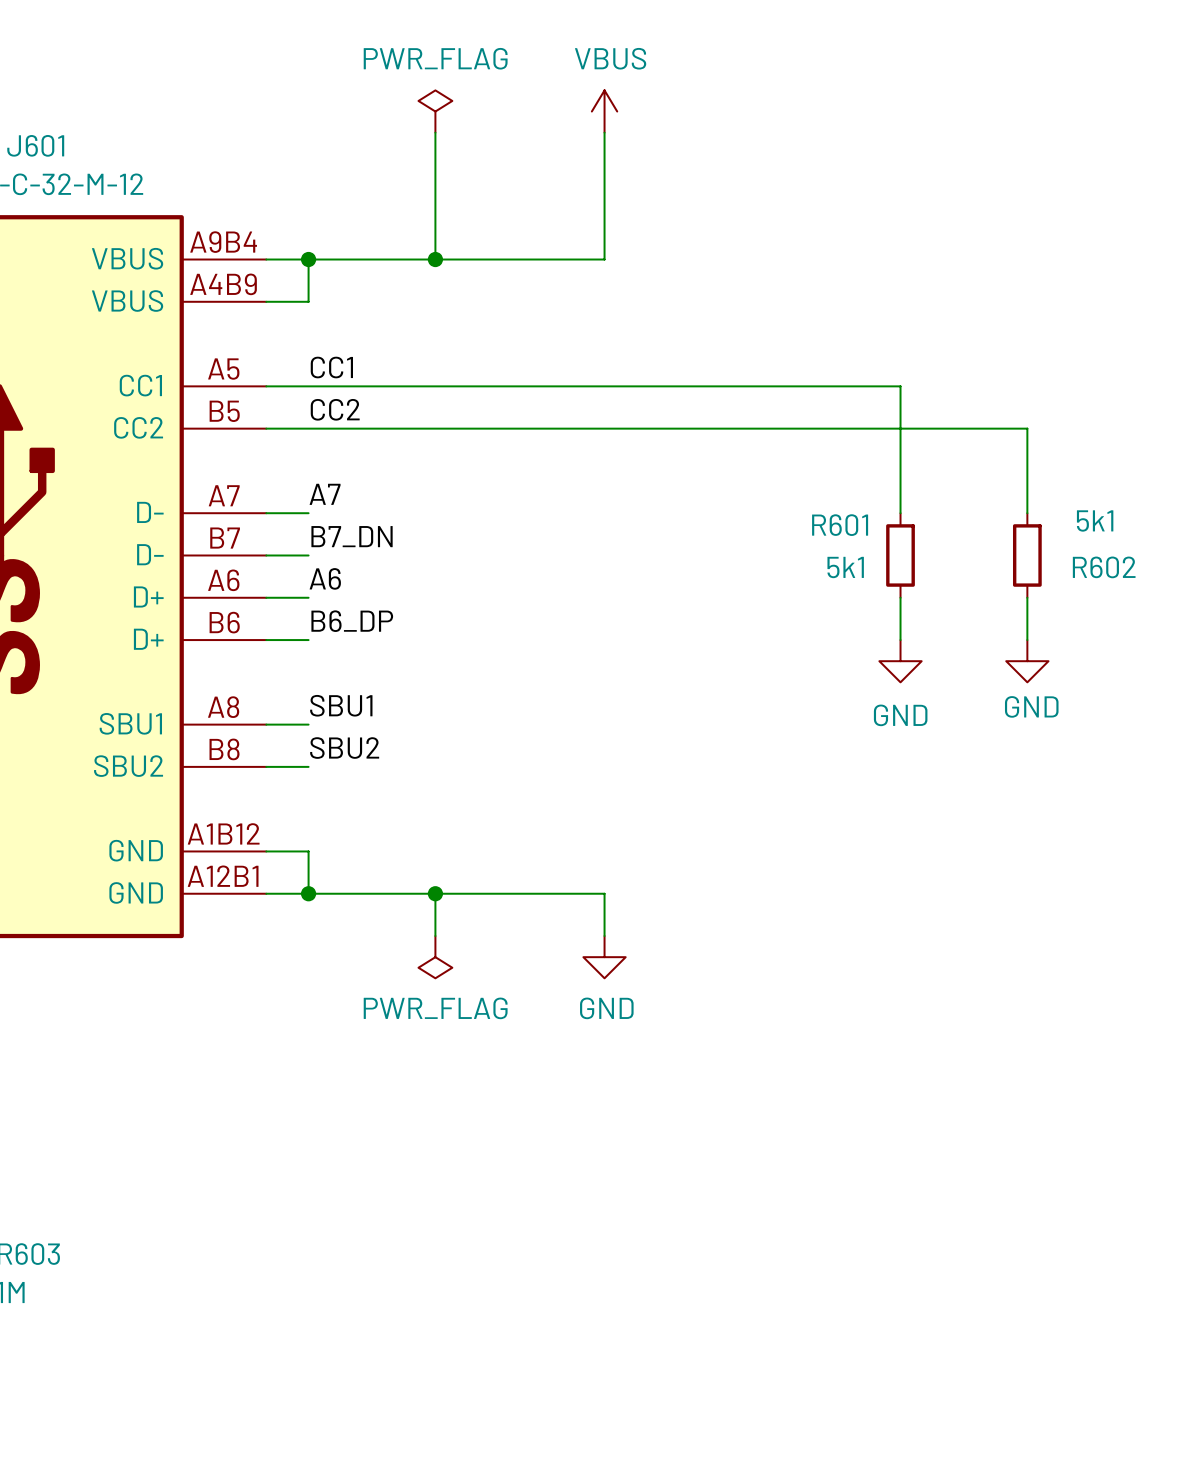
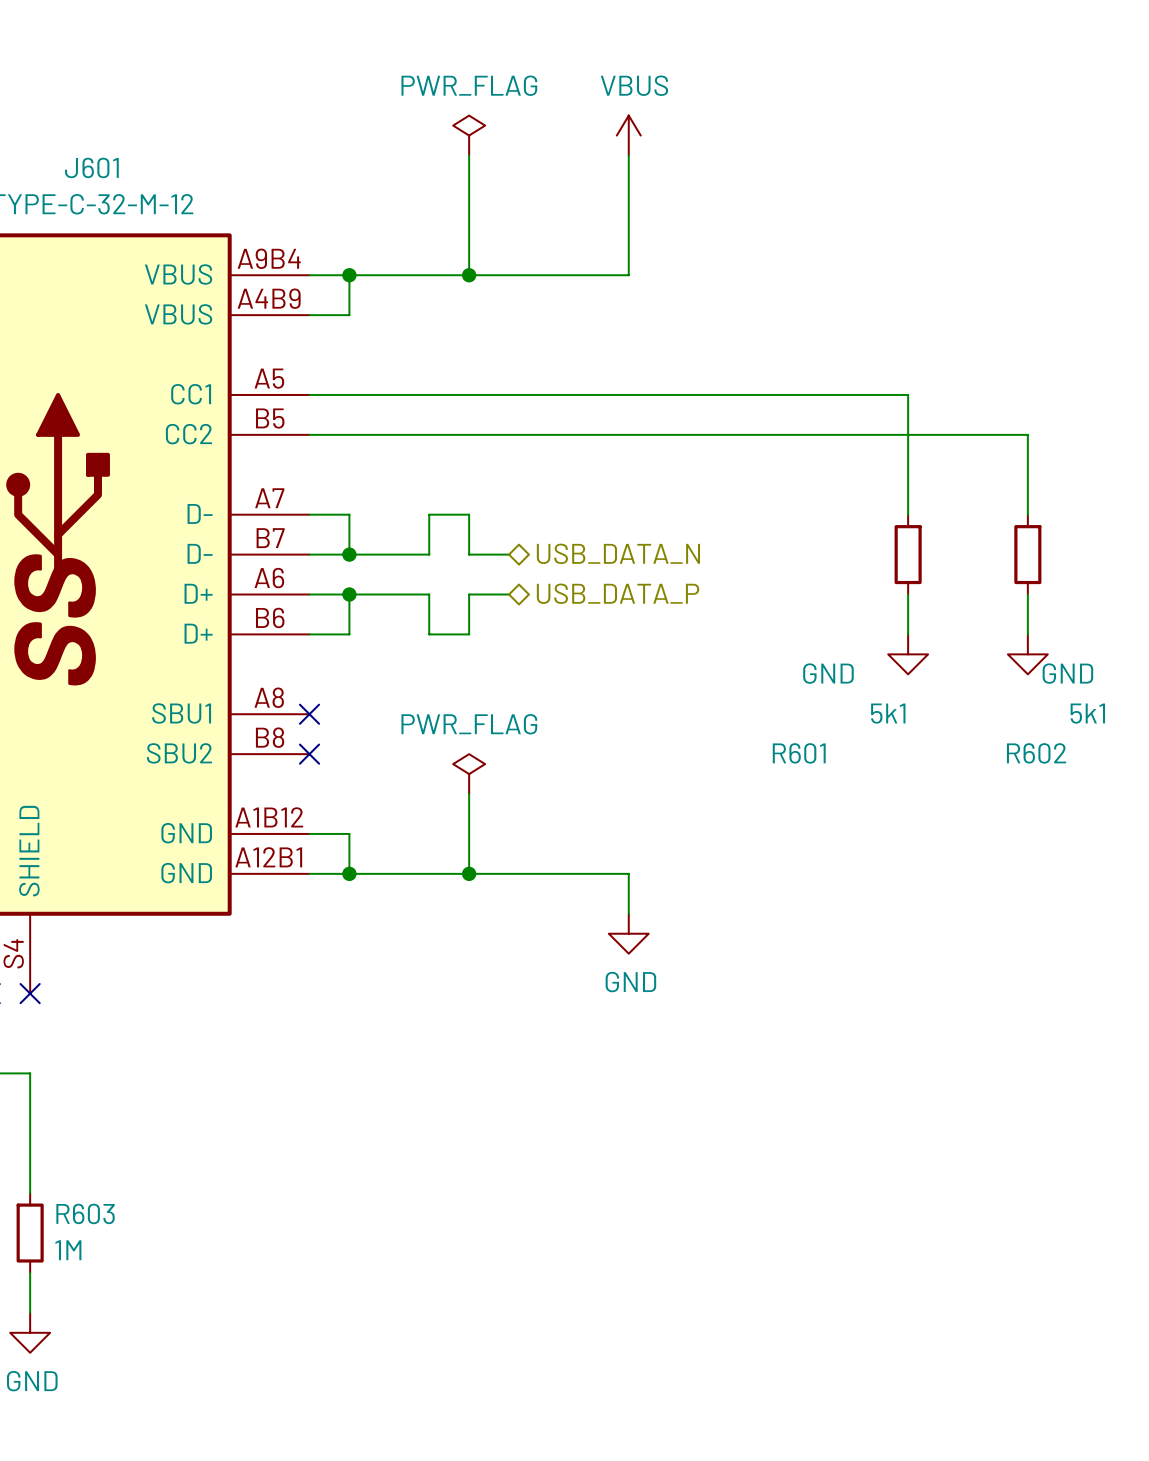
label: CC1 (331, 367) -> none
label: CC2 (335, 409) -> none
label: A7 (325, 494) -> none
wire: none -> (349, 514) (349, 554) (429, 554) (429, 514) (469, 514) (469, 554) (509, 554)
R602 value position: 5k1 (1095, 520) -> 5k1 (1087, 713)
R601 name position: R601 (840, 525) -> R601 (799, 753)
label: B7_DN (352, 536) -> none
hierarchical label: none -> USB_DATA_N (618, 553)
junction: none -> (349, 554)
R601 value position: 5k1 (845, 567) -> 5k1 (888, 713)
R602 name position: R602 (1104, 567) -> R602 (1036, 753)
label: A6 (325, 578) -> none
hierarchical label: none -> USB_DATA_P (618, 593)
junction: none -> (349, 594)
wire: none -> (509, 594) (469, 594) (469, 634) (429, 634) (429, 594) (349, 594) (349, 634)
label: B6_DP (352, 621) -> none
label: SBU1 (341, 705) -> none
power symbol text position: GND (1031, 706) -> GND (1067, 673)
power symbol text position: GND (900, 715) -> GND (828, 673)
wire: (266, 724) (308, 724) -> none
no-connect mark: none -> (309, 714)
label: SBU2 (344, 748) -> none
wire: (266, 766) (308, 766) -> none
no-connect mark: none -> (309, 754)
wire: (435, 893) (435, 936) -> (469, 873) (469, 794)
power symbol rotation: 0° (435, 957) -> 180° (469, 774)
power symbol position: PWR_FLAG (435, 957) -> PWR_FLAG (469, 774)

